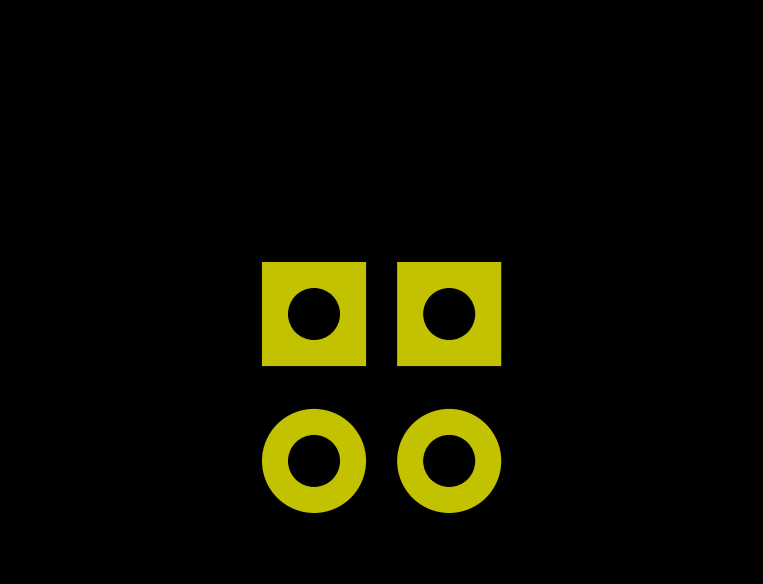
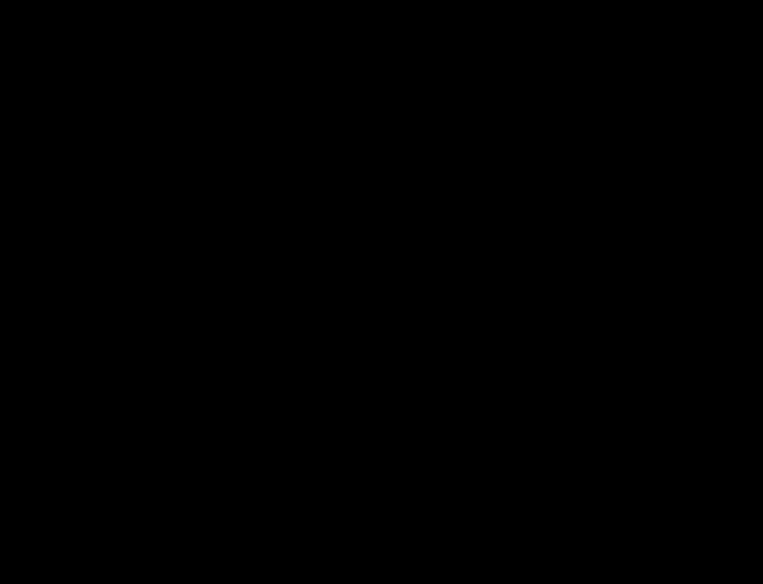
part: (314, 387) -> none
part: (449, 387) -> none

